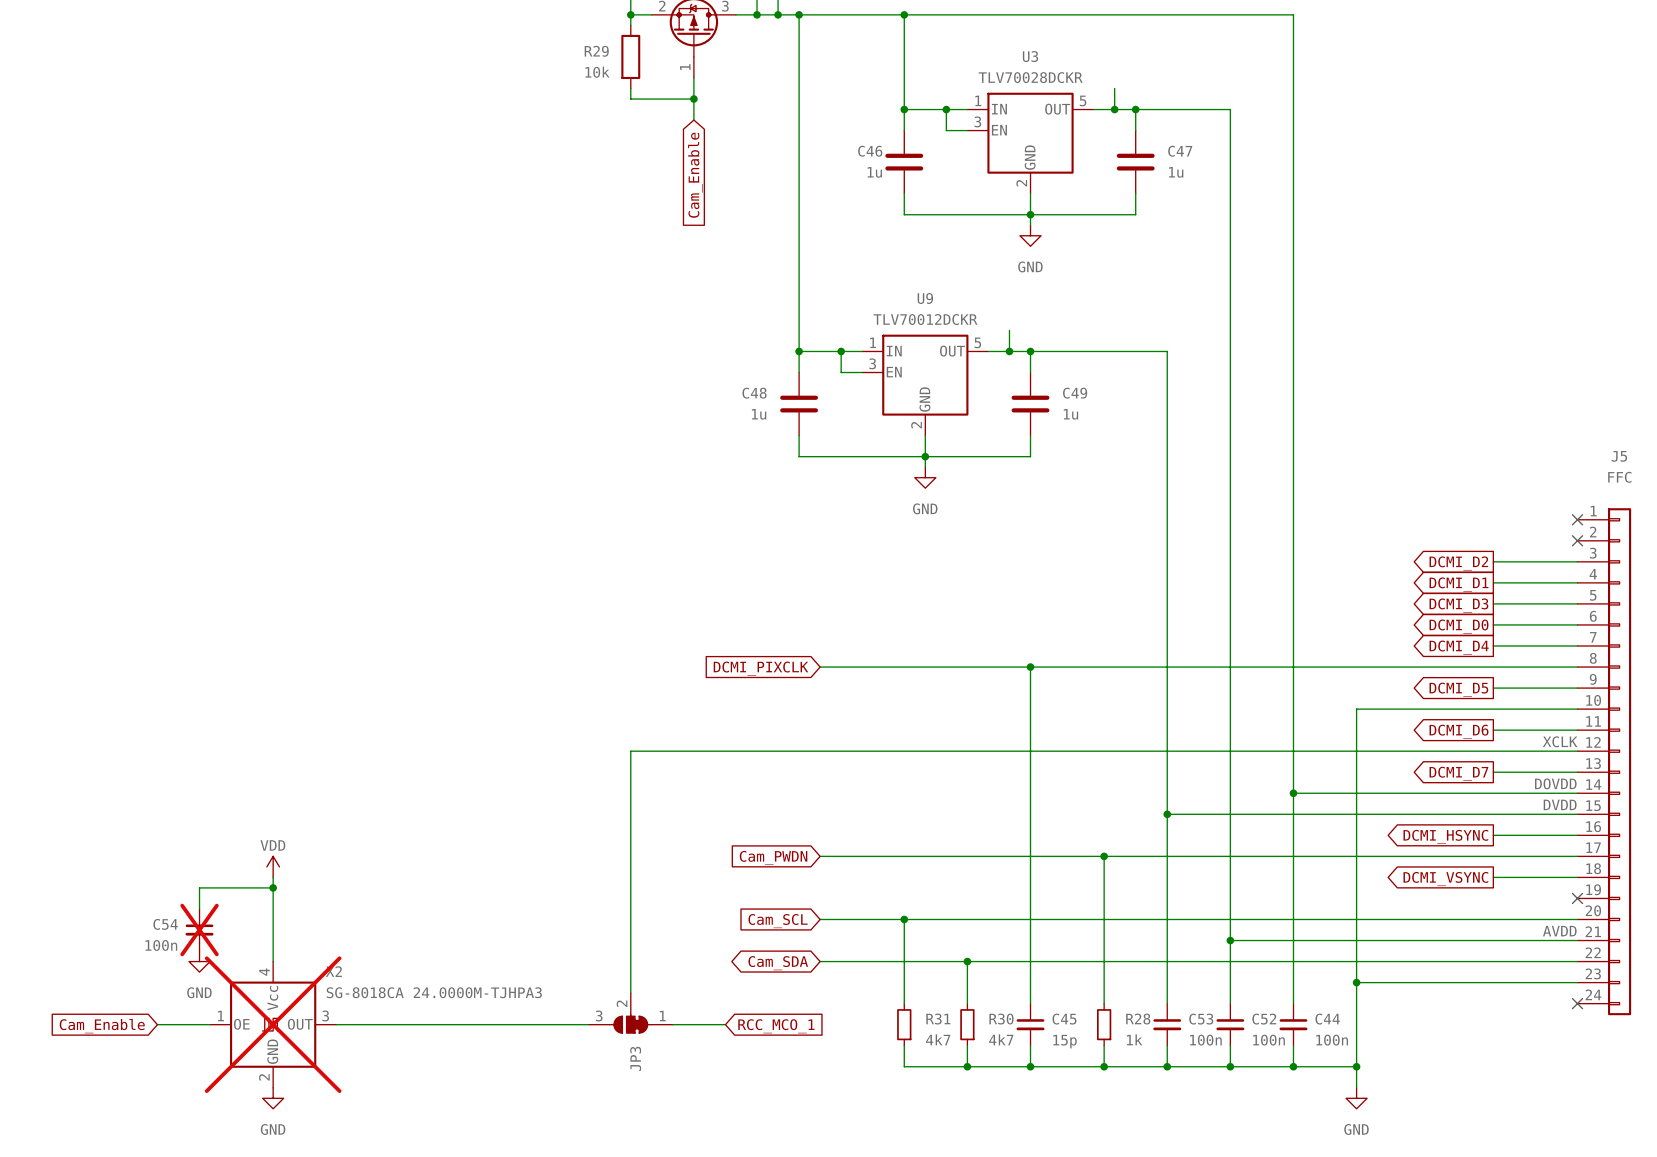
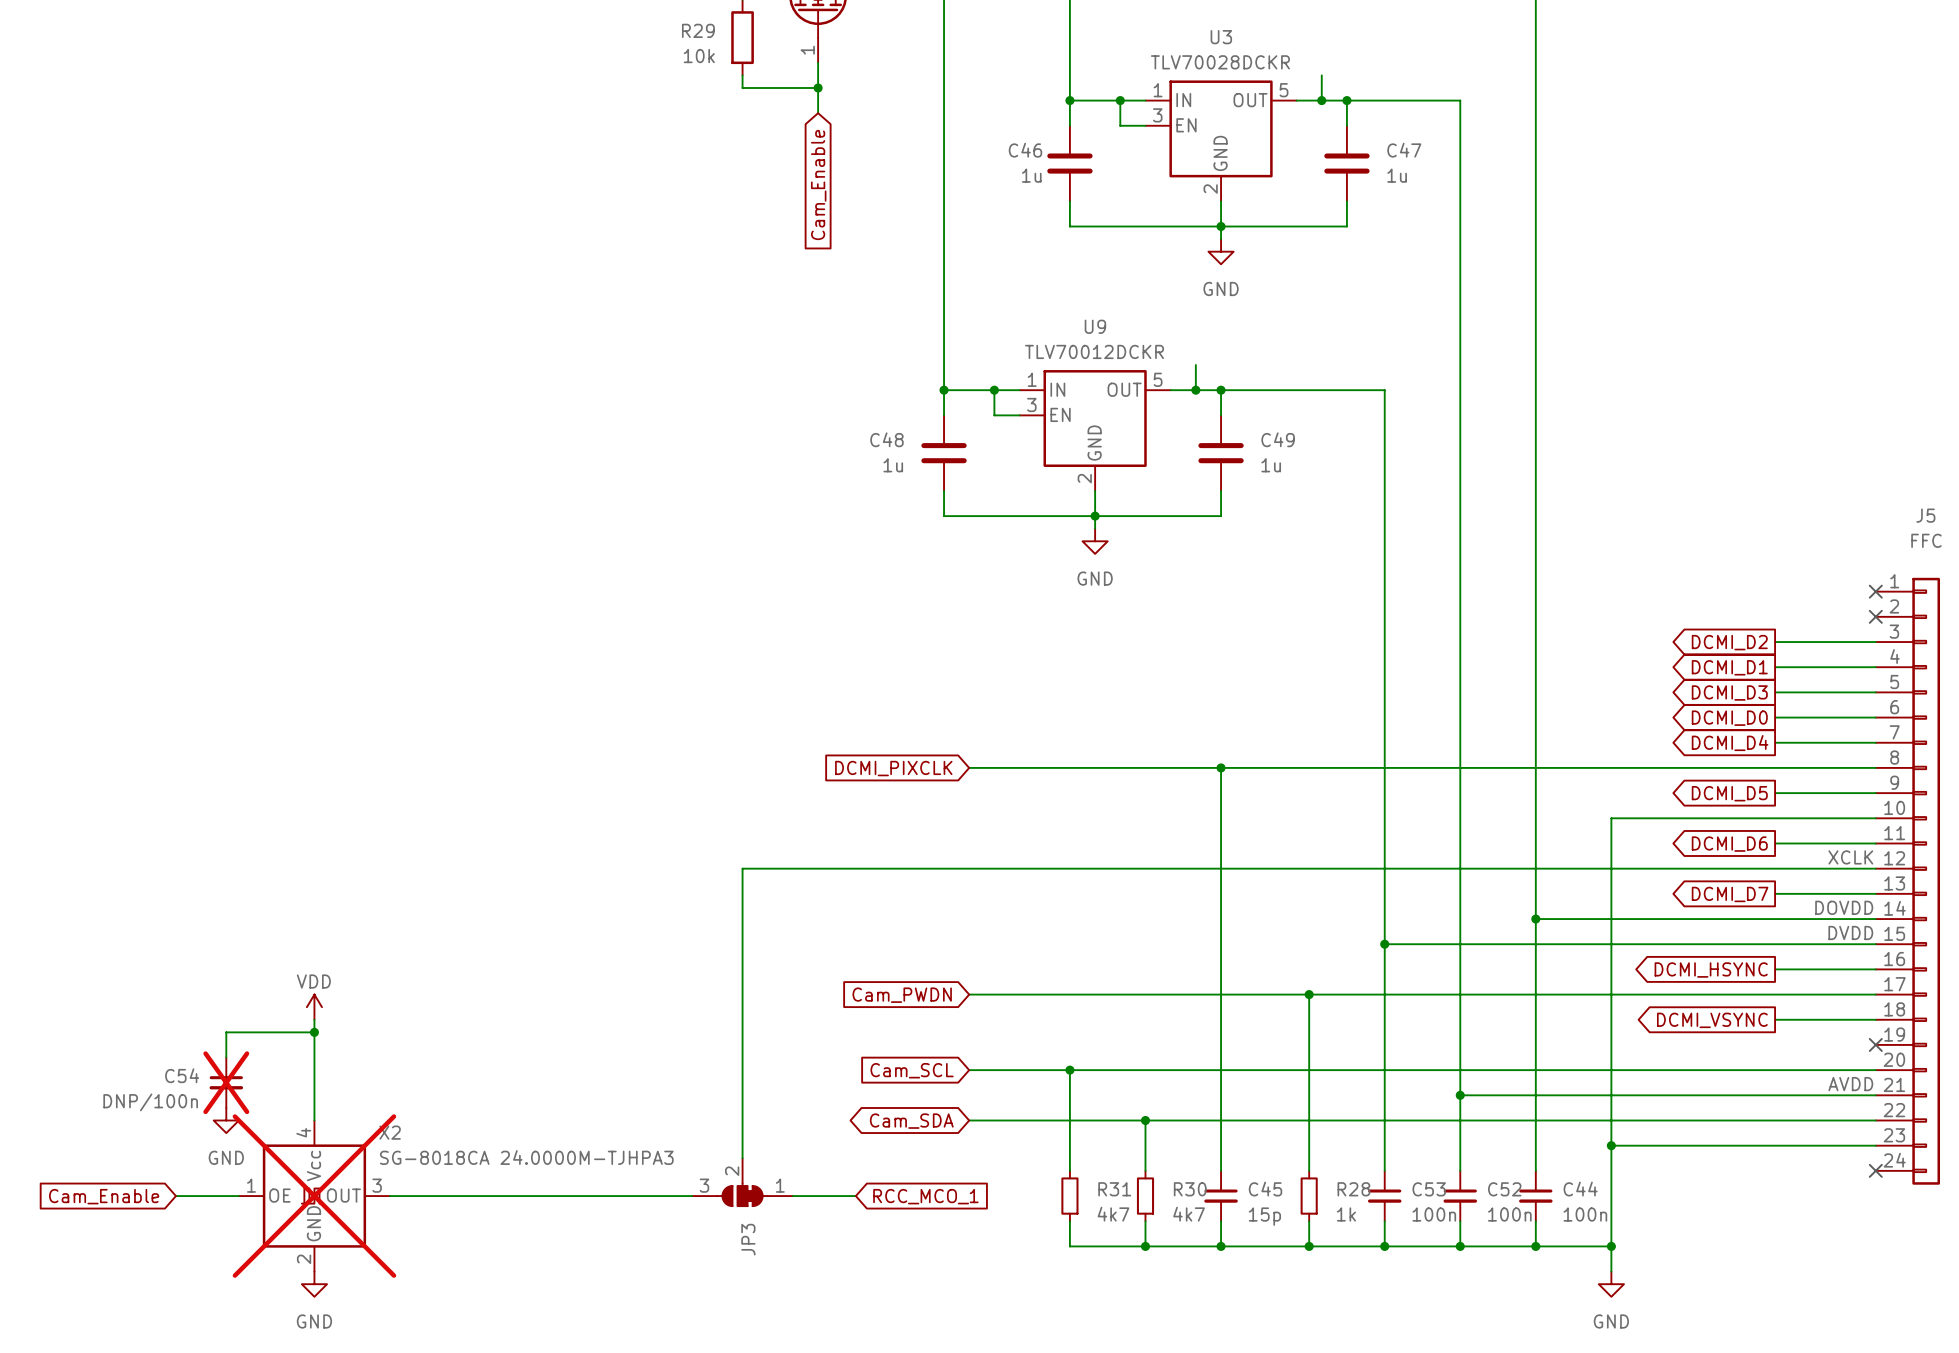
C54 value: 100n (161, 945) -> DNP/100n (150, 1102)

